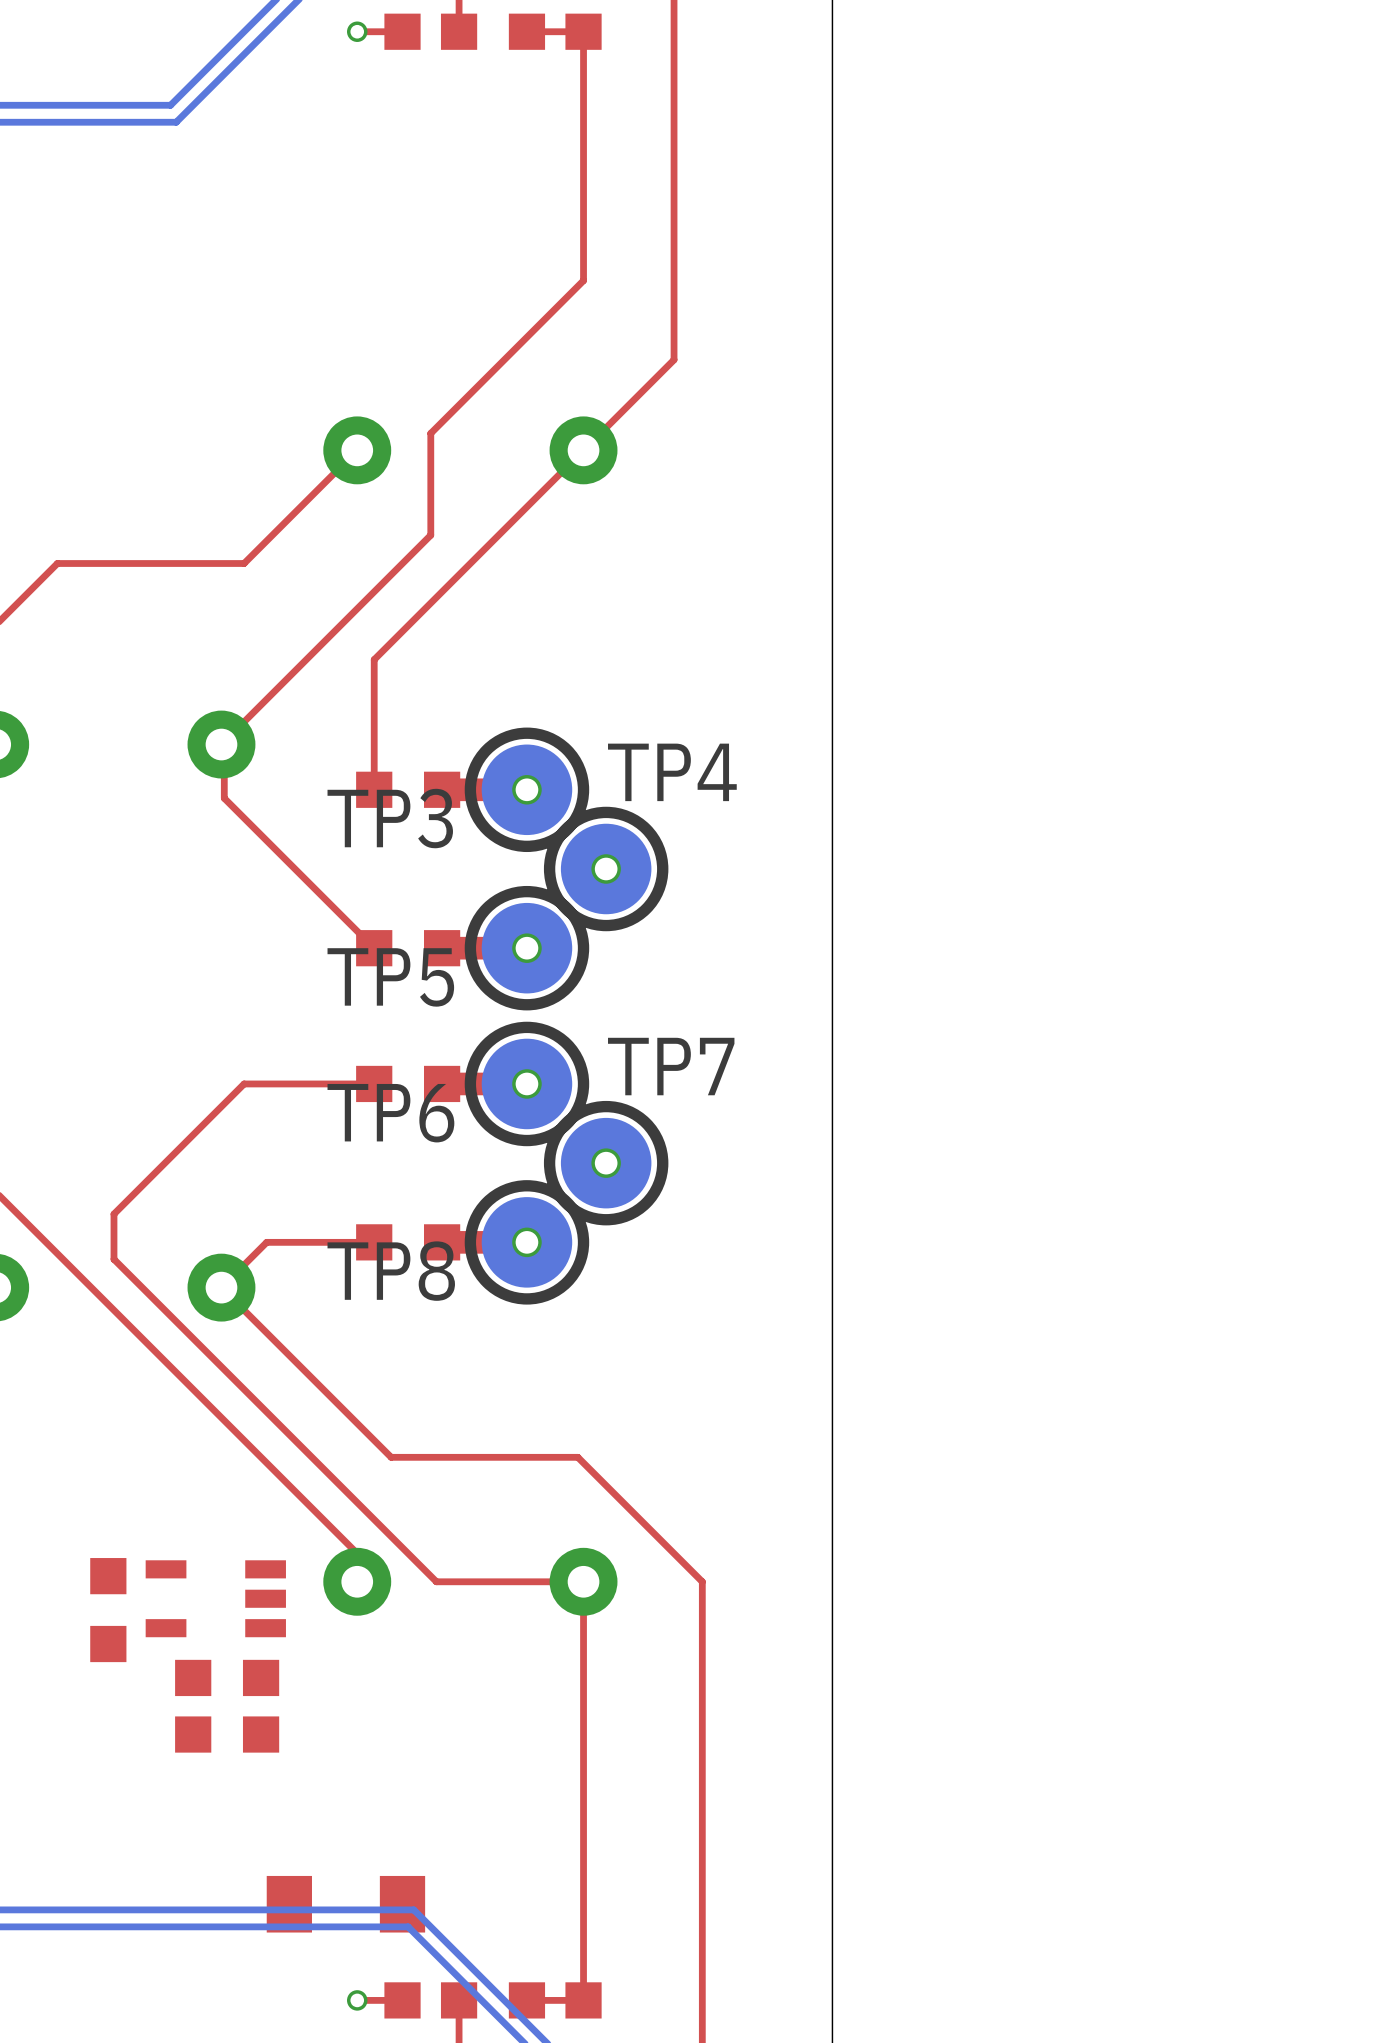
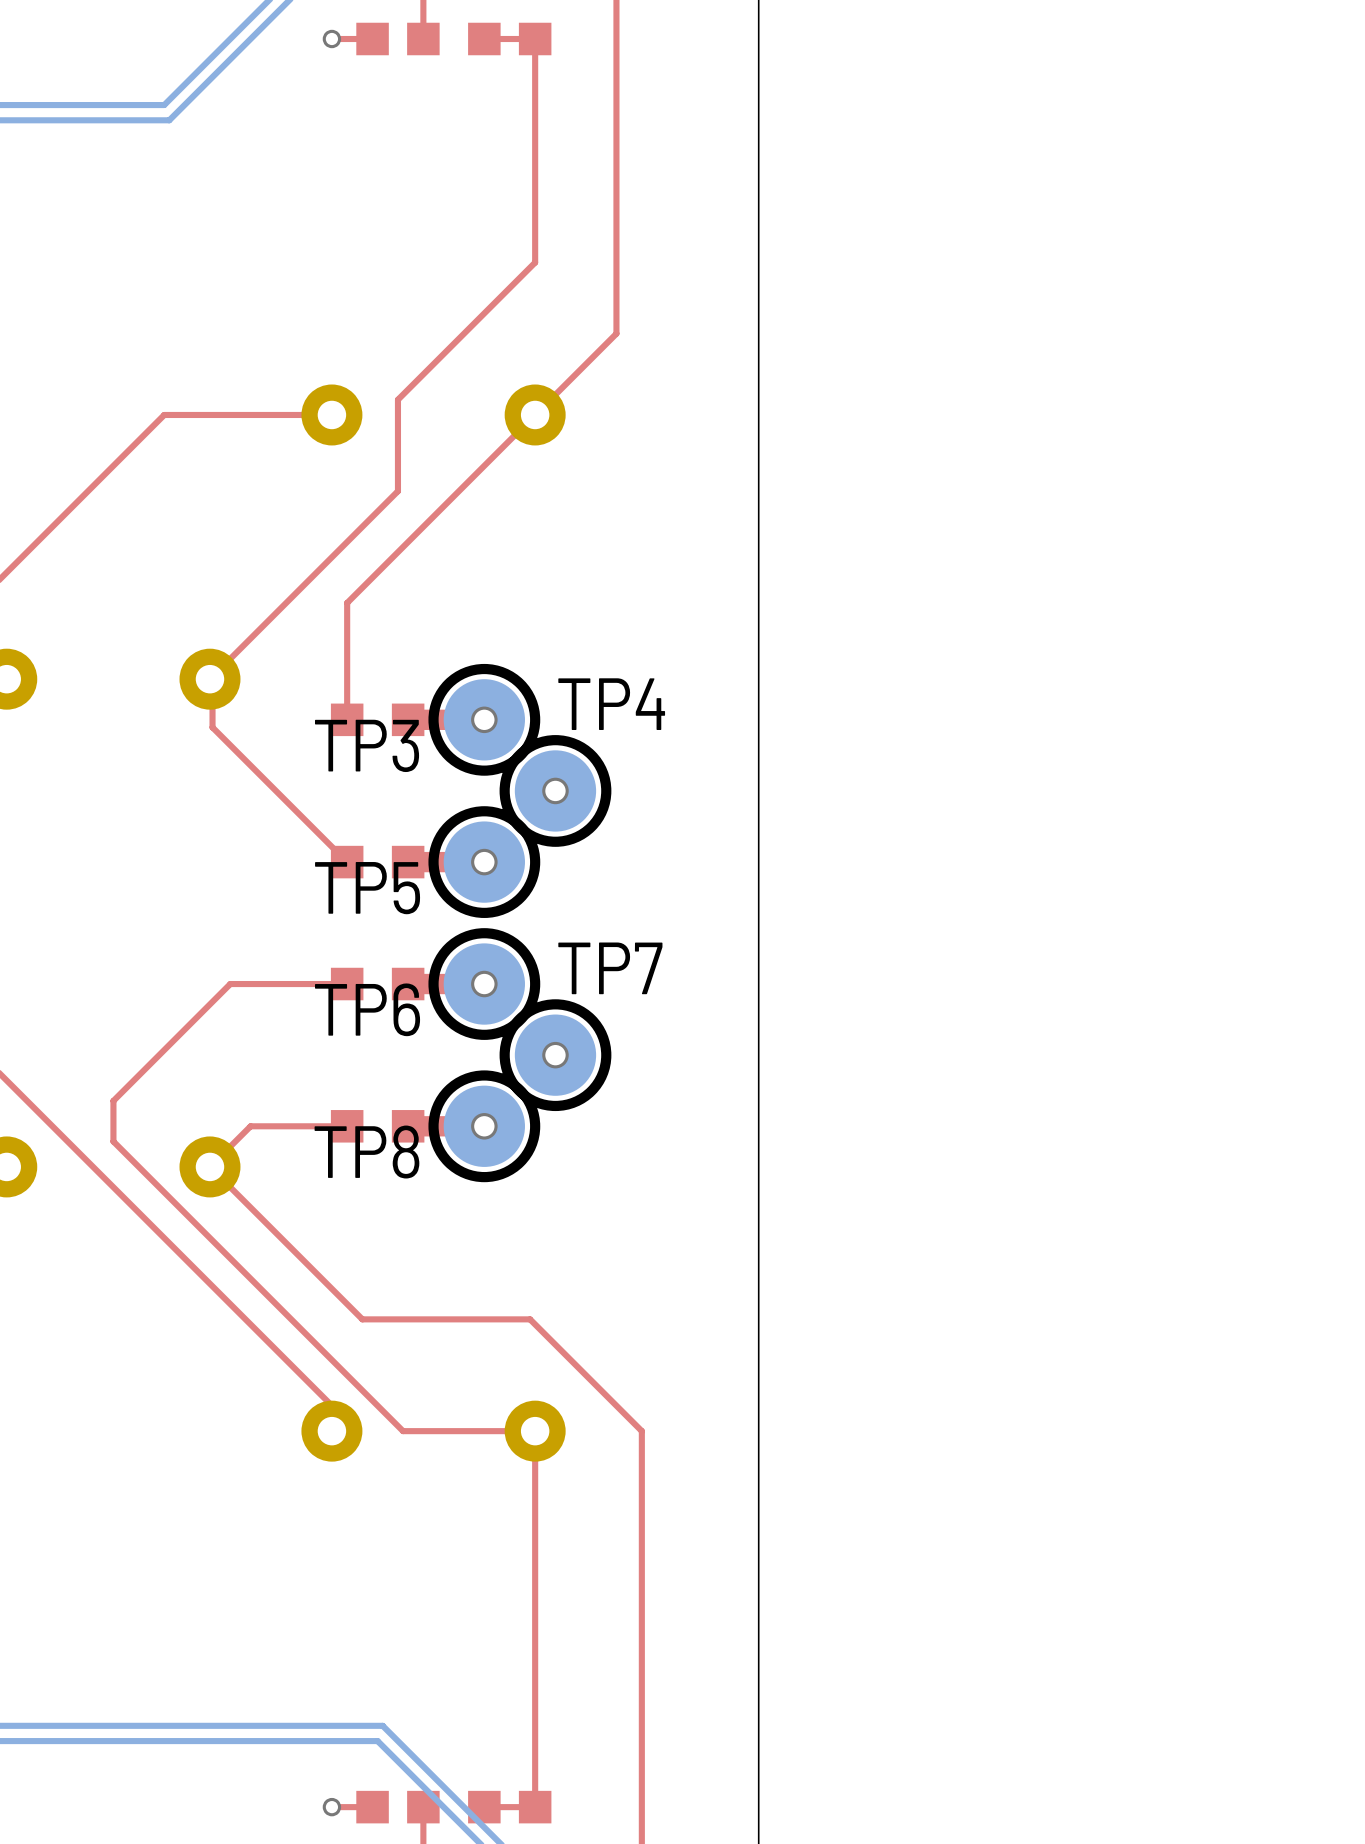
top track: (357, 450) (244, 563) (57, 563) -> (331, 414) (164, 414) (62, 516)
part: (215, 1598) -> none
part: (108, 1610) -> none
part: (227, 1677) -> none
part: (227, 1734) -> none
part: (345, 1904) -> none

